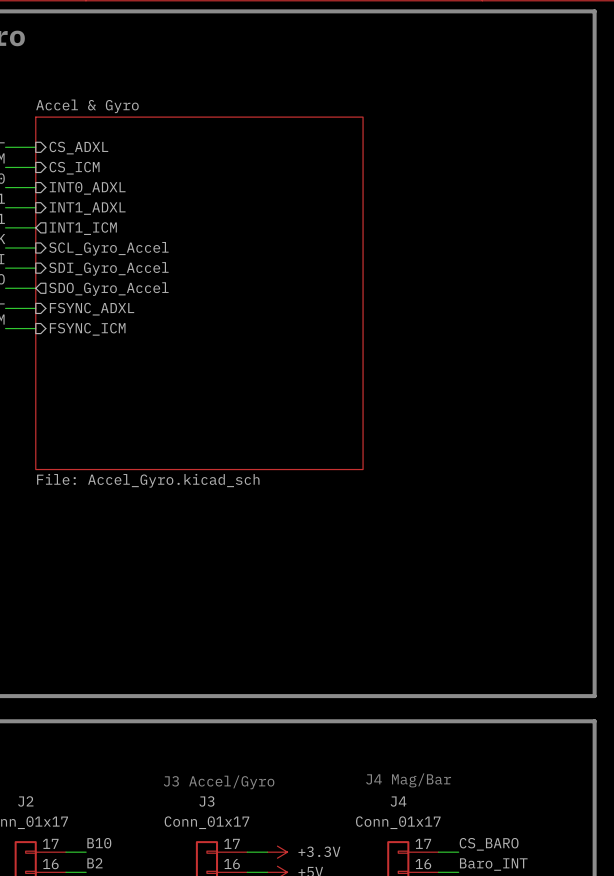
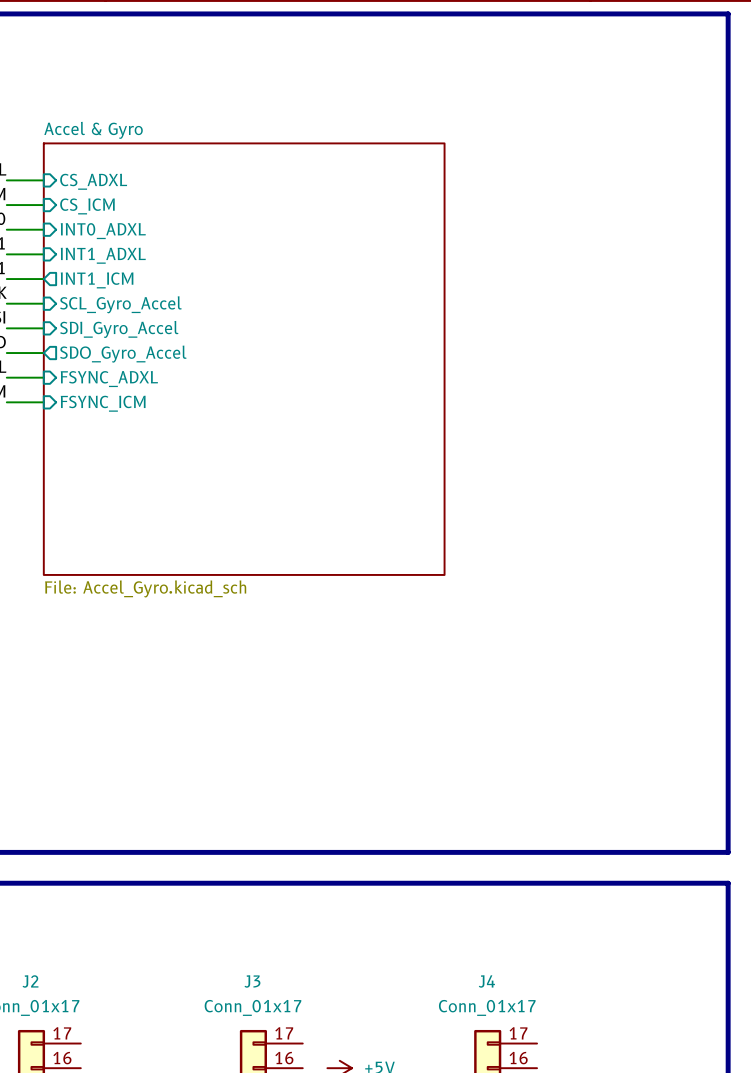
text: J4 Mag/Bar (408, 780) -> none
text: J3 Accel/Gyro (219, 782) -> none
label: B10 (99, 843) -> none
label: CS_BARO (489, 844) -> none
wire: (65, 852) (86, 852) -> none
wire: (247, 852) (267, 852) -> none
power symbol: +3.3V (277, 852) -> none
wire: (438, 852) (458, 852) -> none
label: B2 (94, 863) -> none
label: Baro_INT (493, 864) -> none
wire: (65, 872) (86, 872) -> none
wire: (247, 872) (267, 872) -> none
wire: (438, 872) (458, 872) -> none

